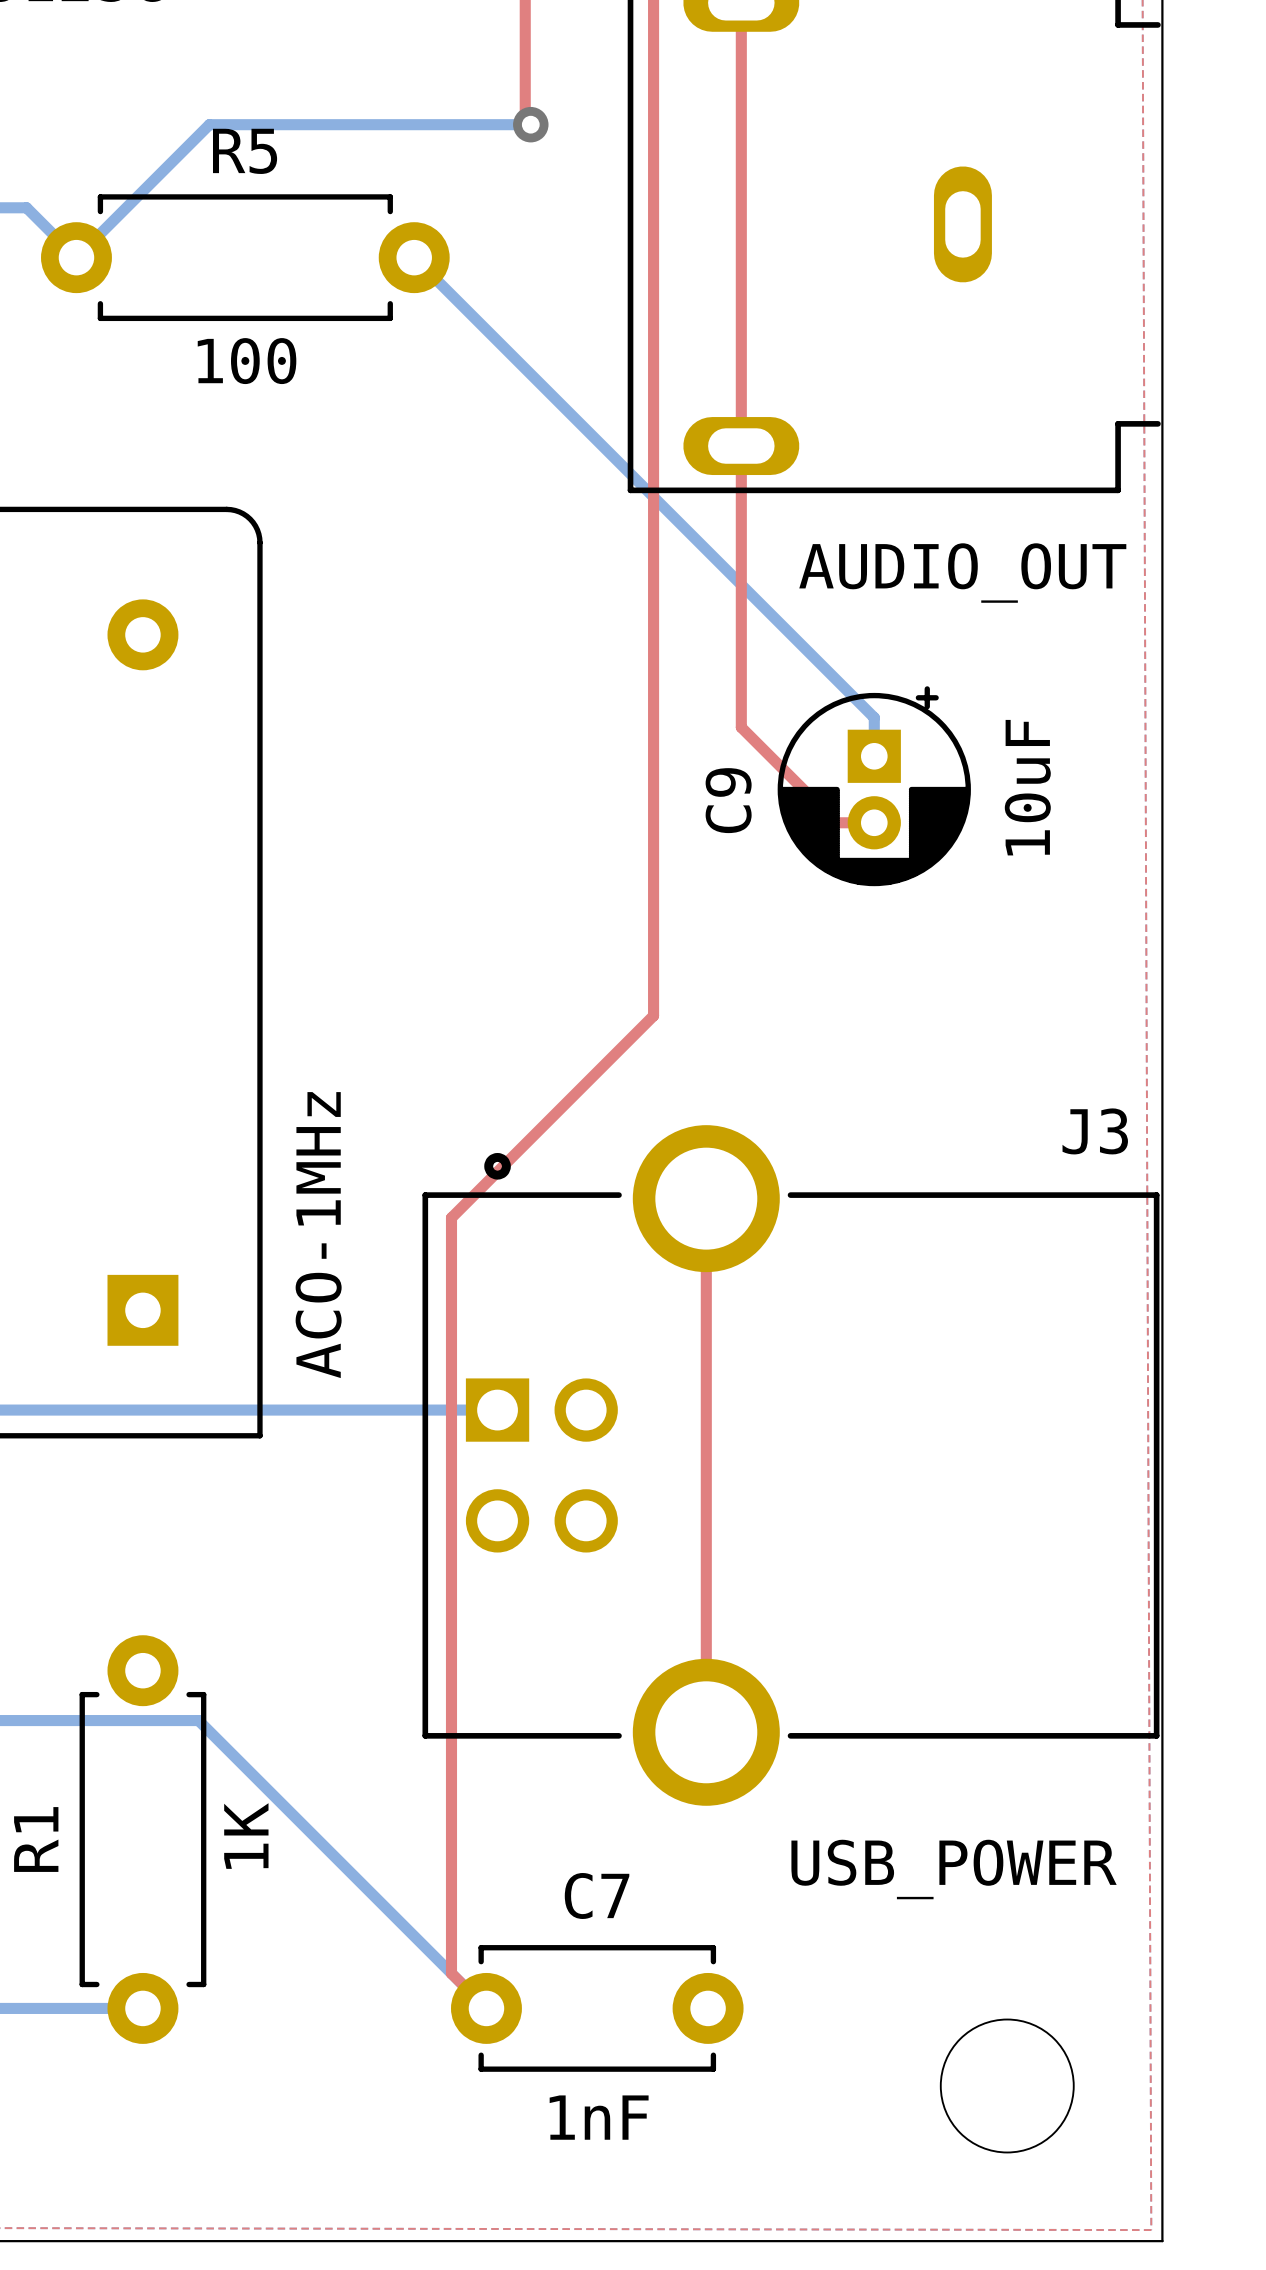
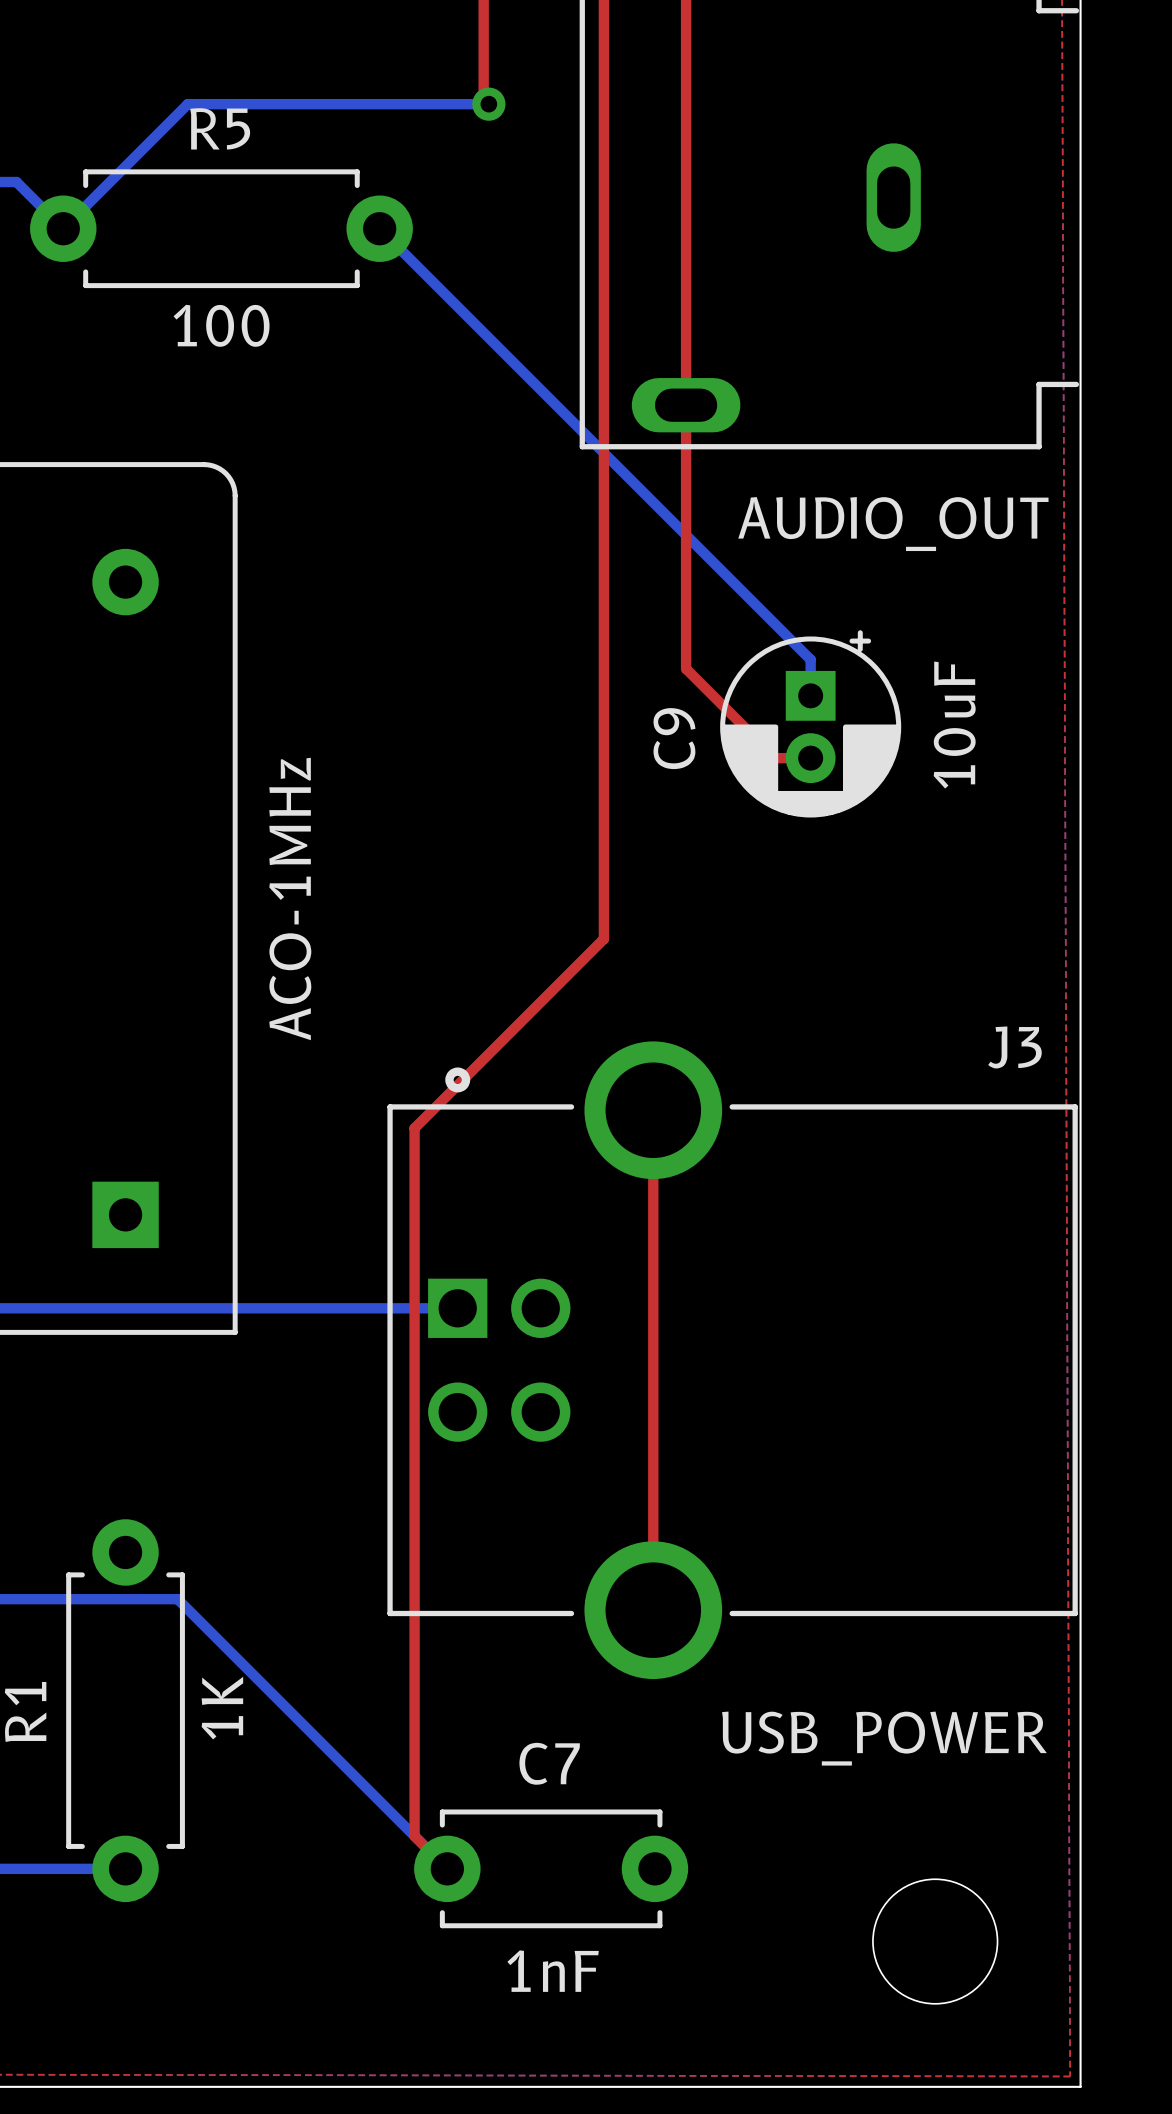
part value position: ACO-1MHz (318, 1235) -> ACO-1MHz (290, 899)

